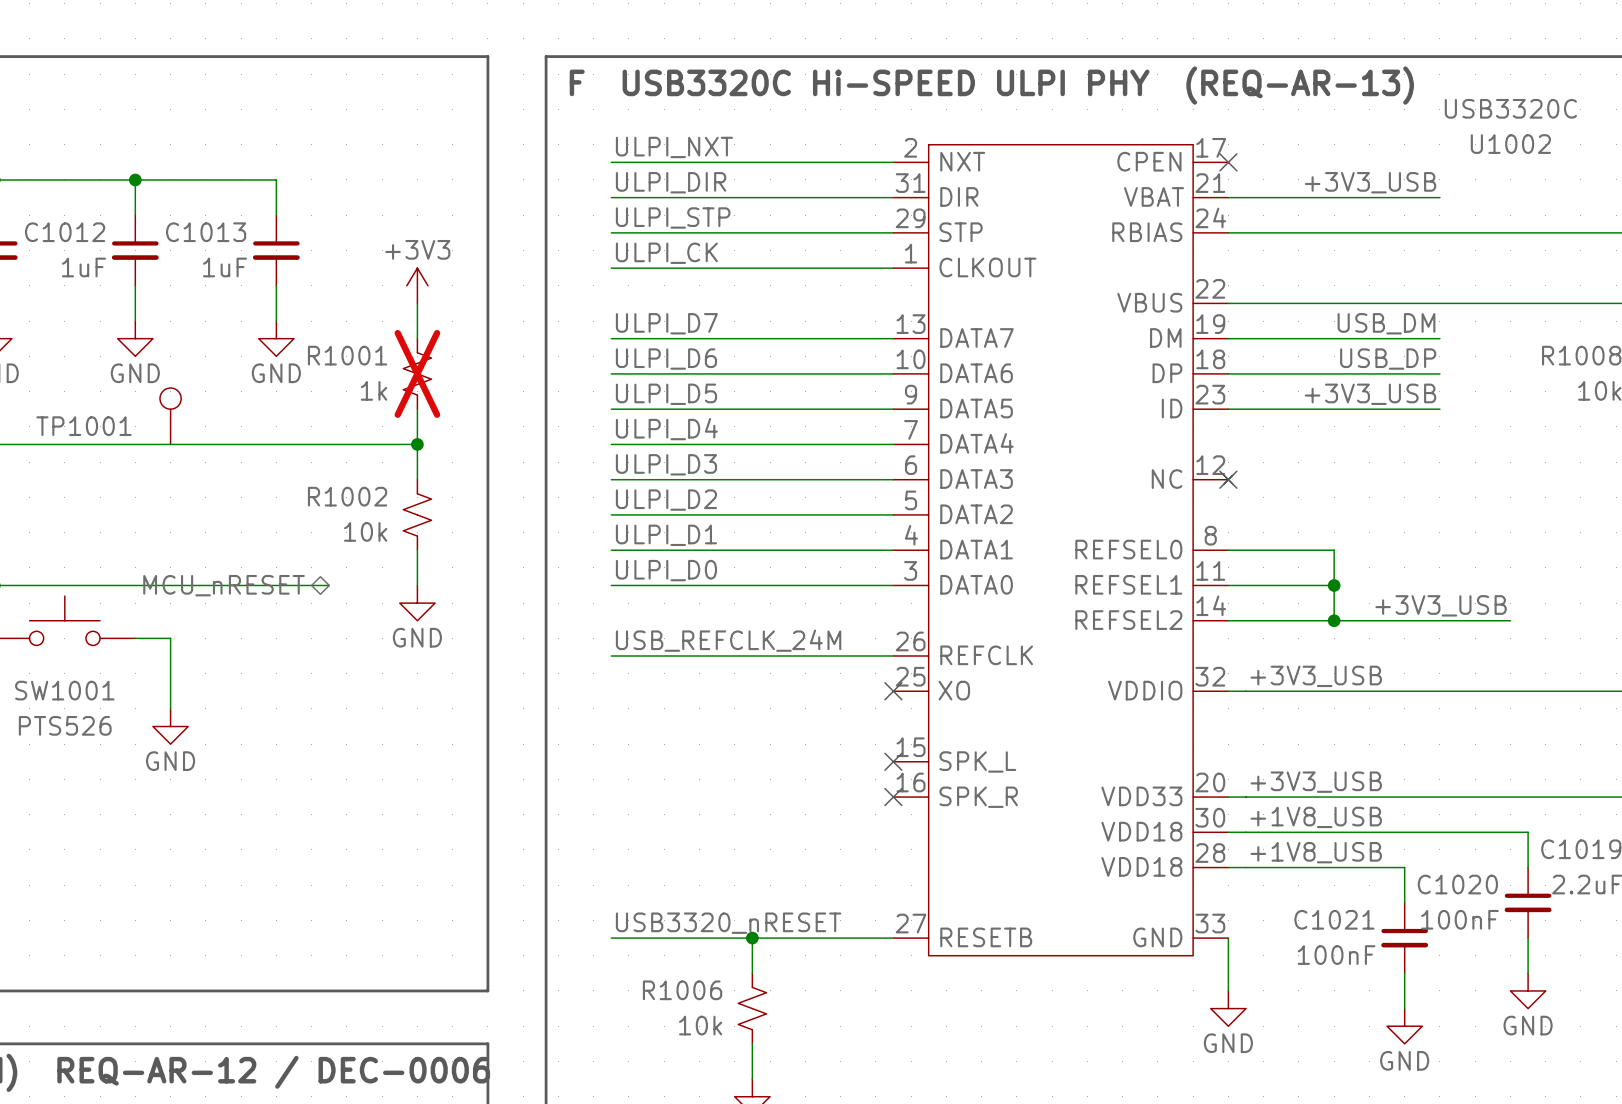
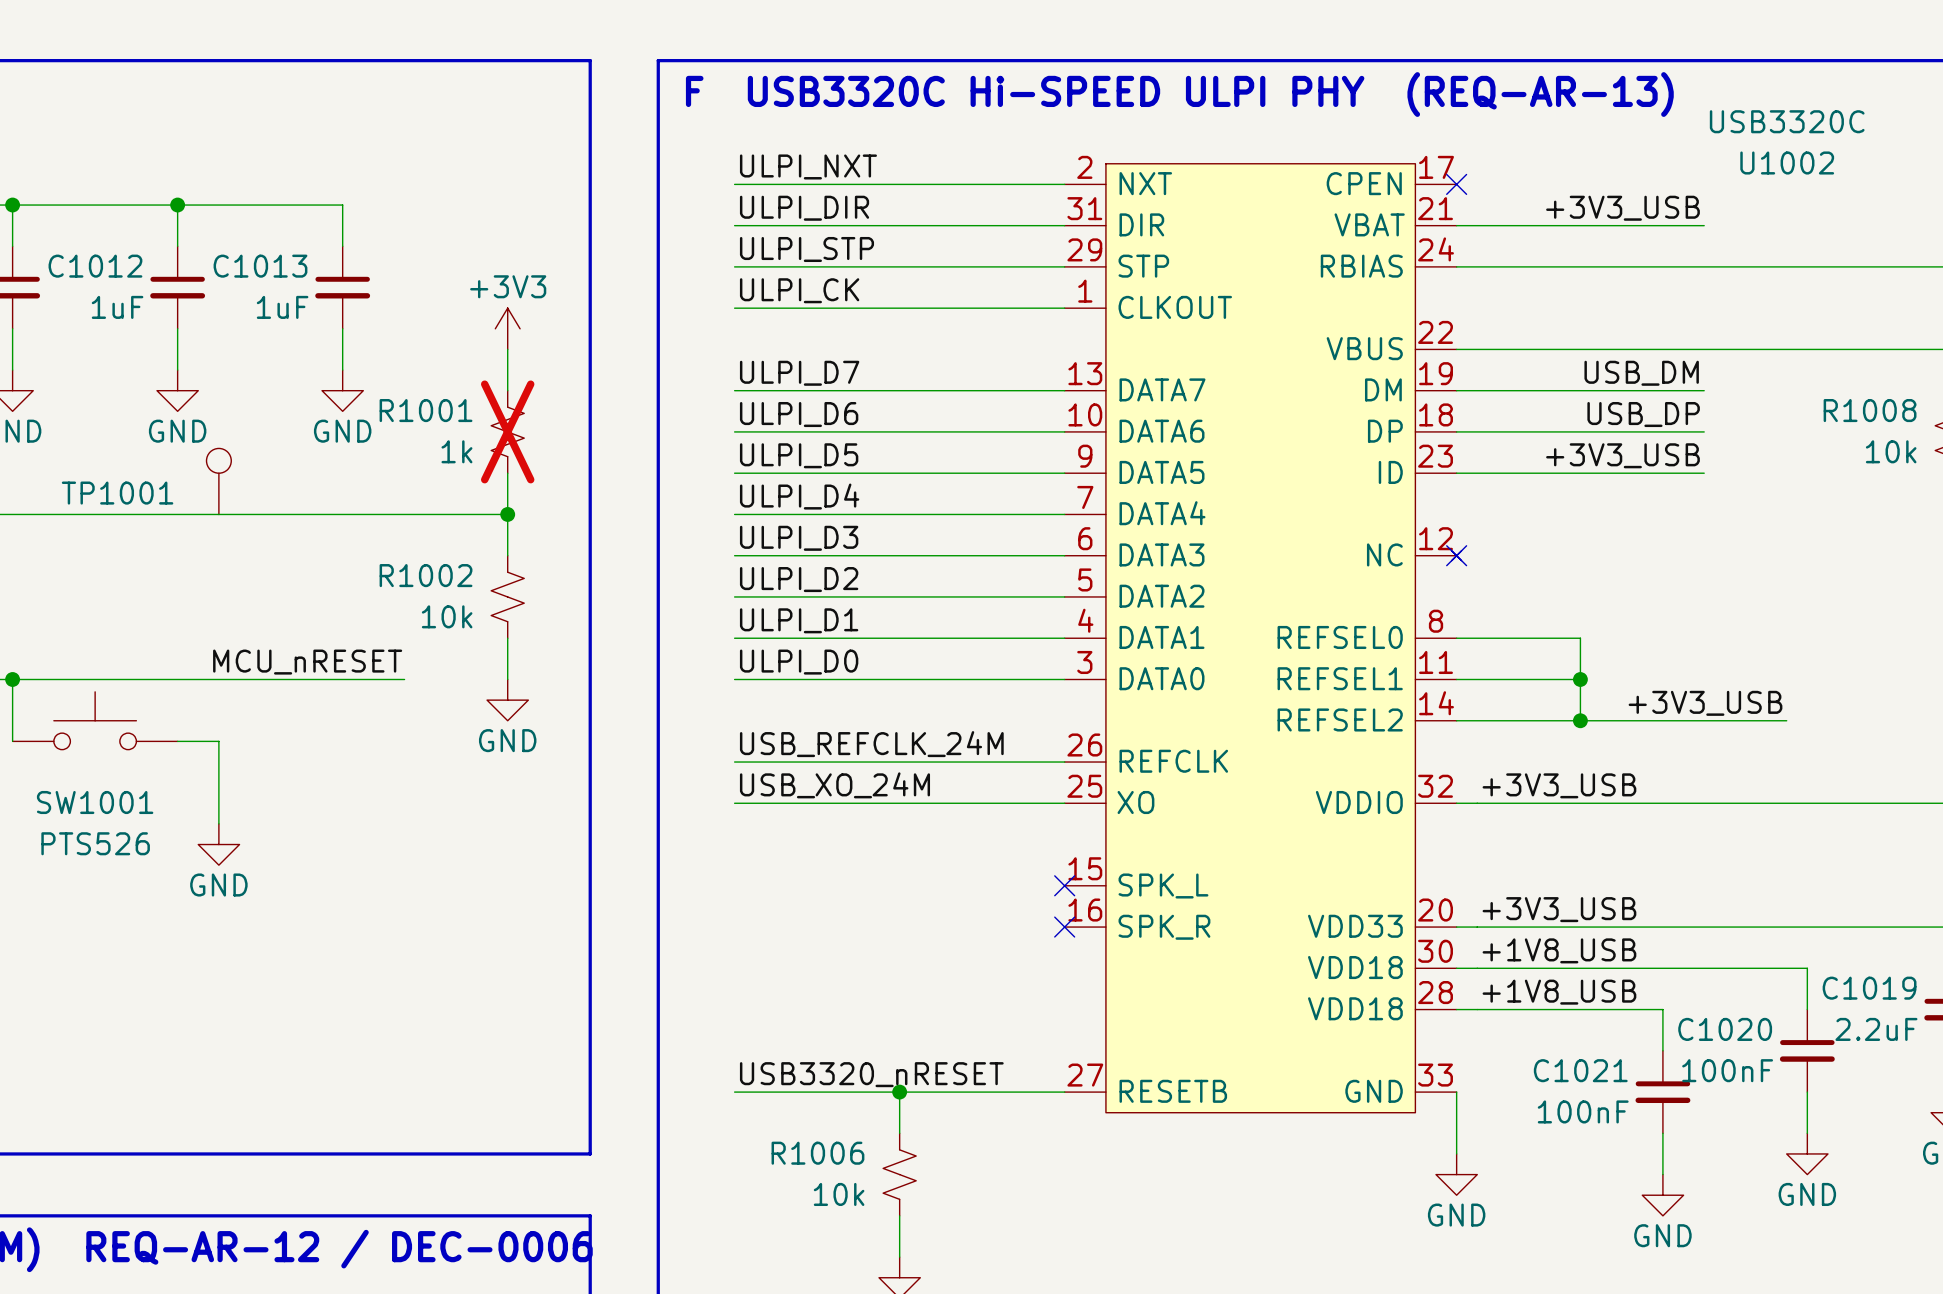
label: none -> MCU_nRESET (307, 662)
hierarchical label: MCU_nRESET (224, 585) -> none
label: none -> USB_XO_24M (834, 785)
wire: none -> (734, 803) (1064, 803)
no-connect mark: (893, 691) -> none

